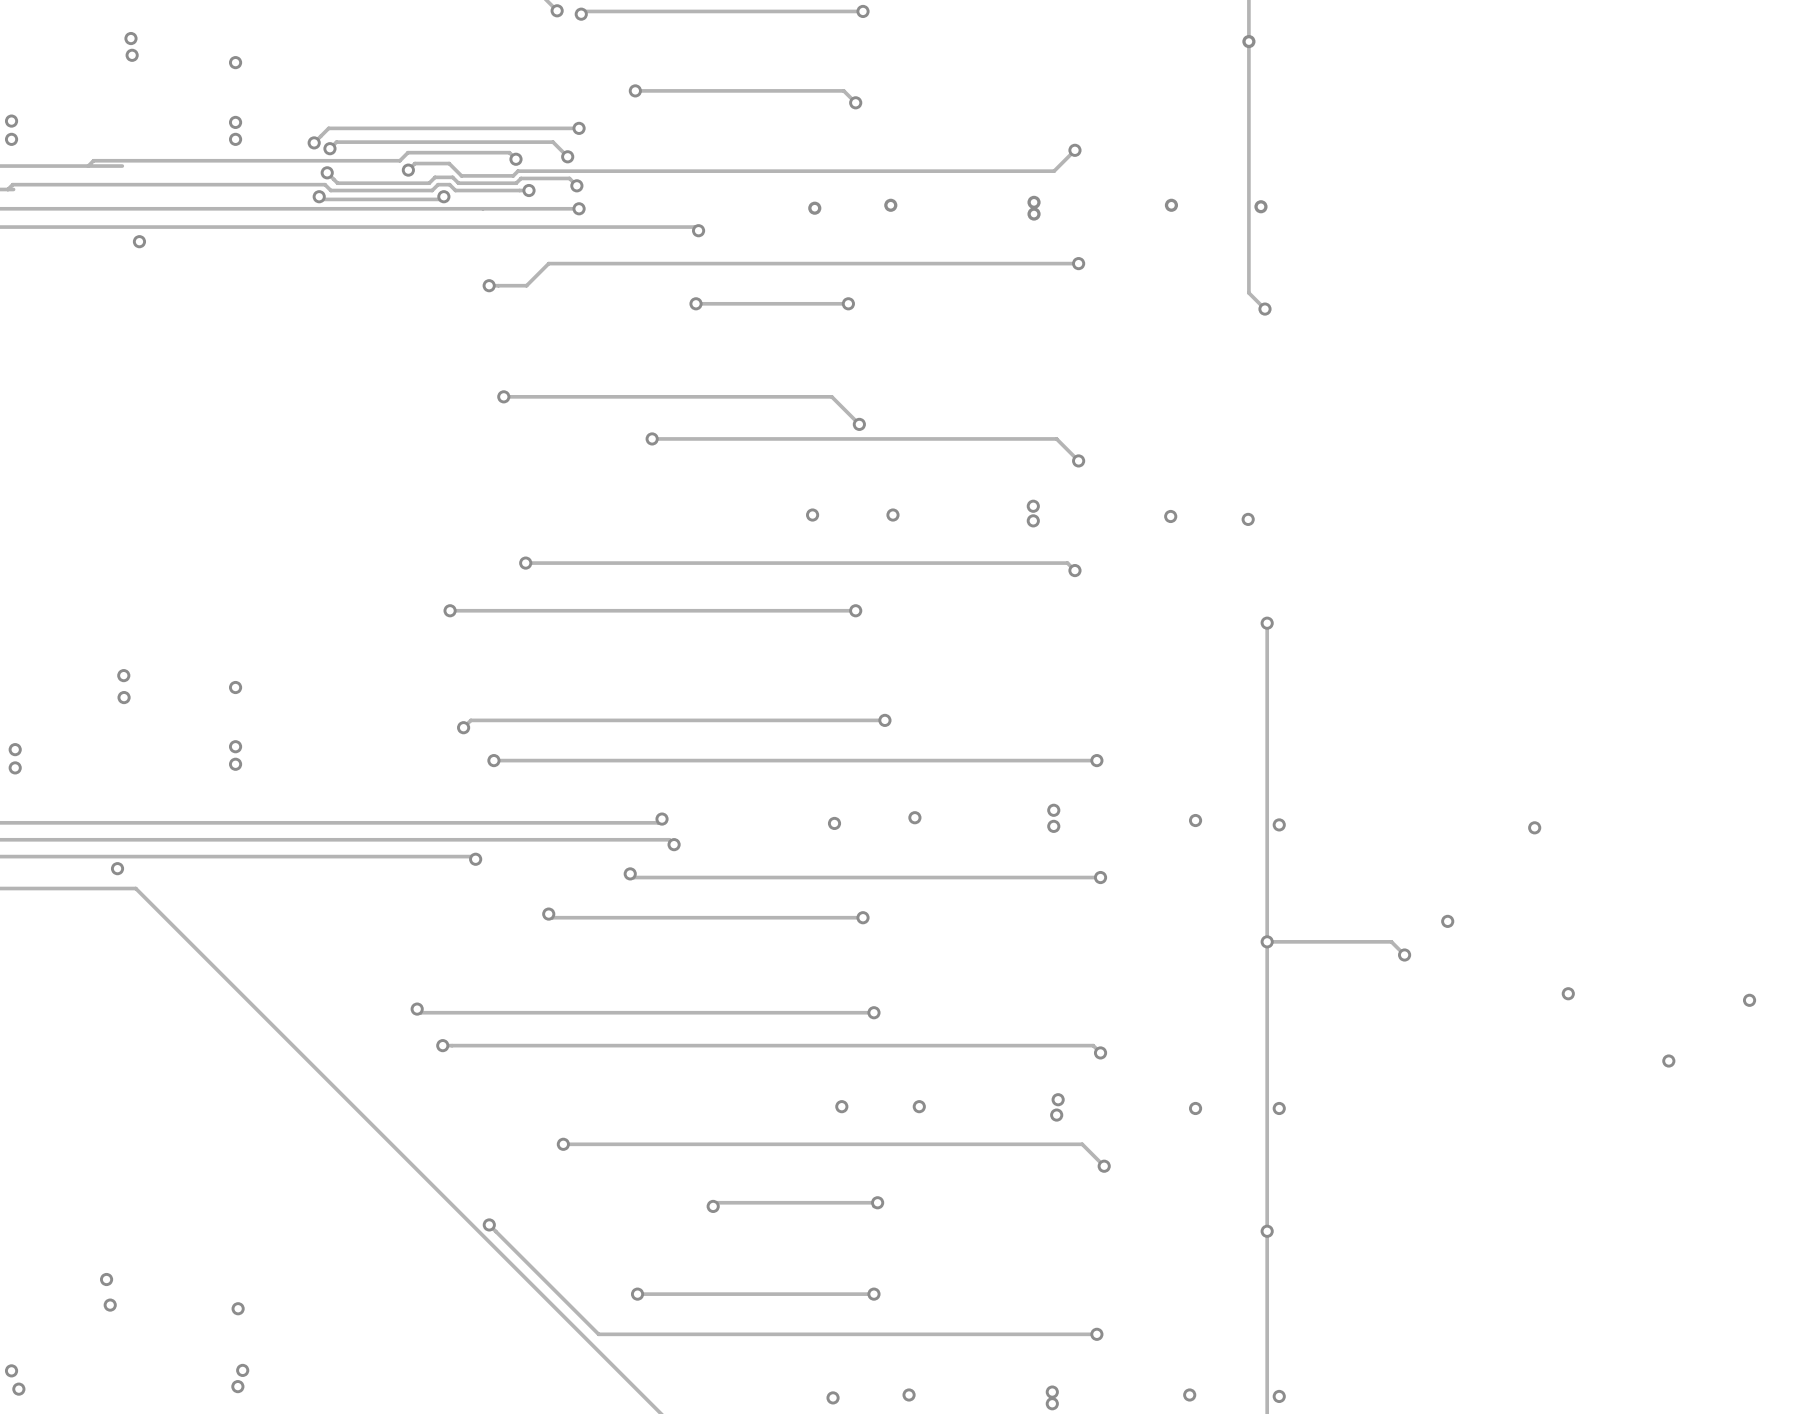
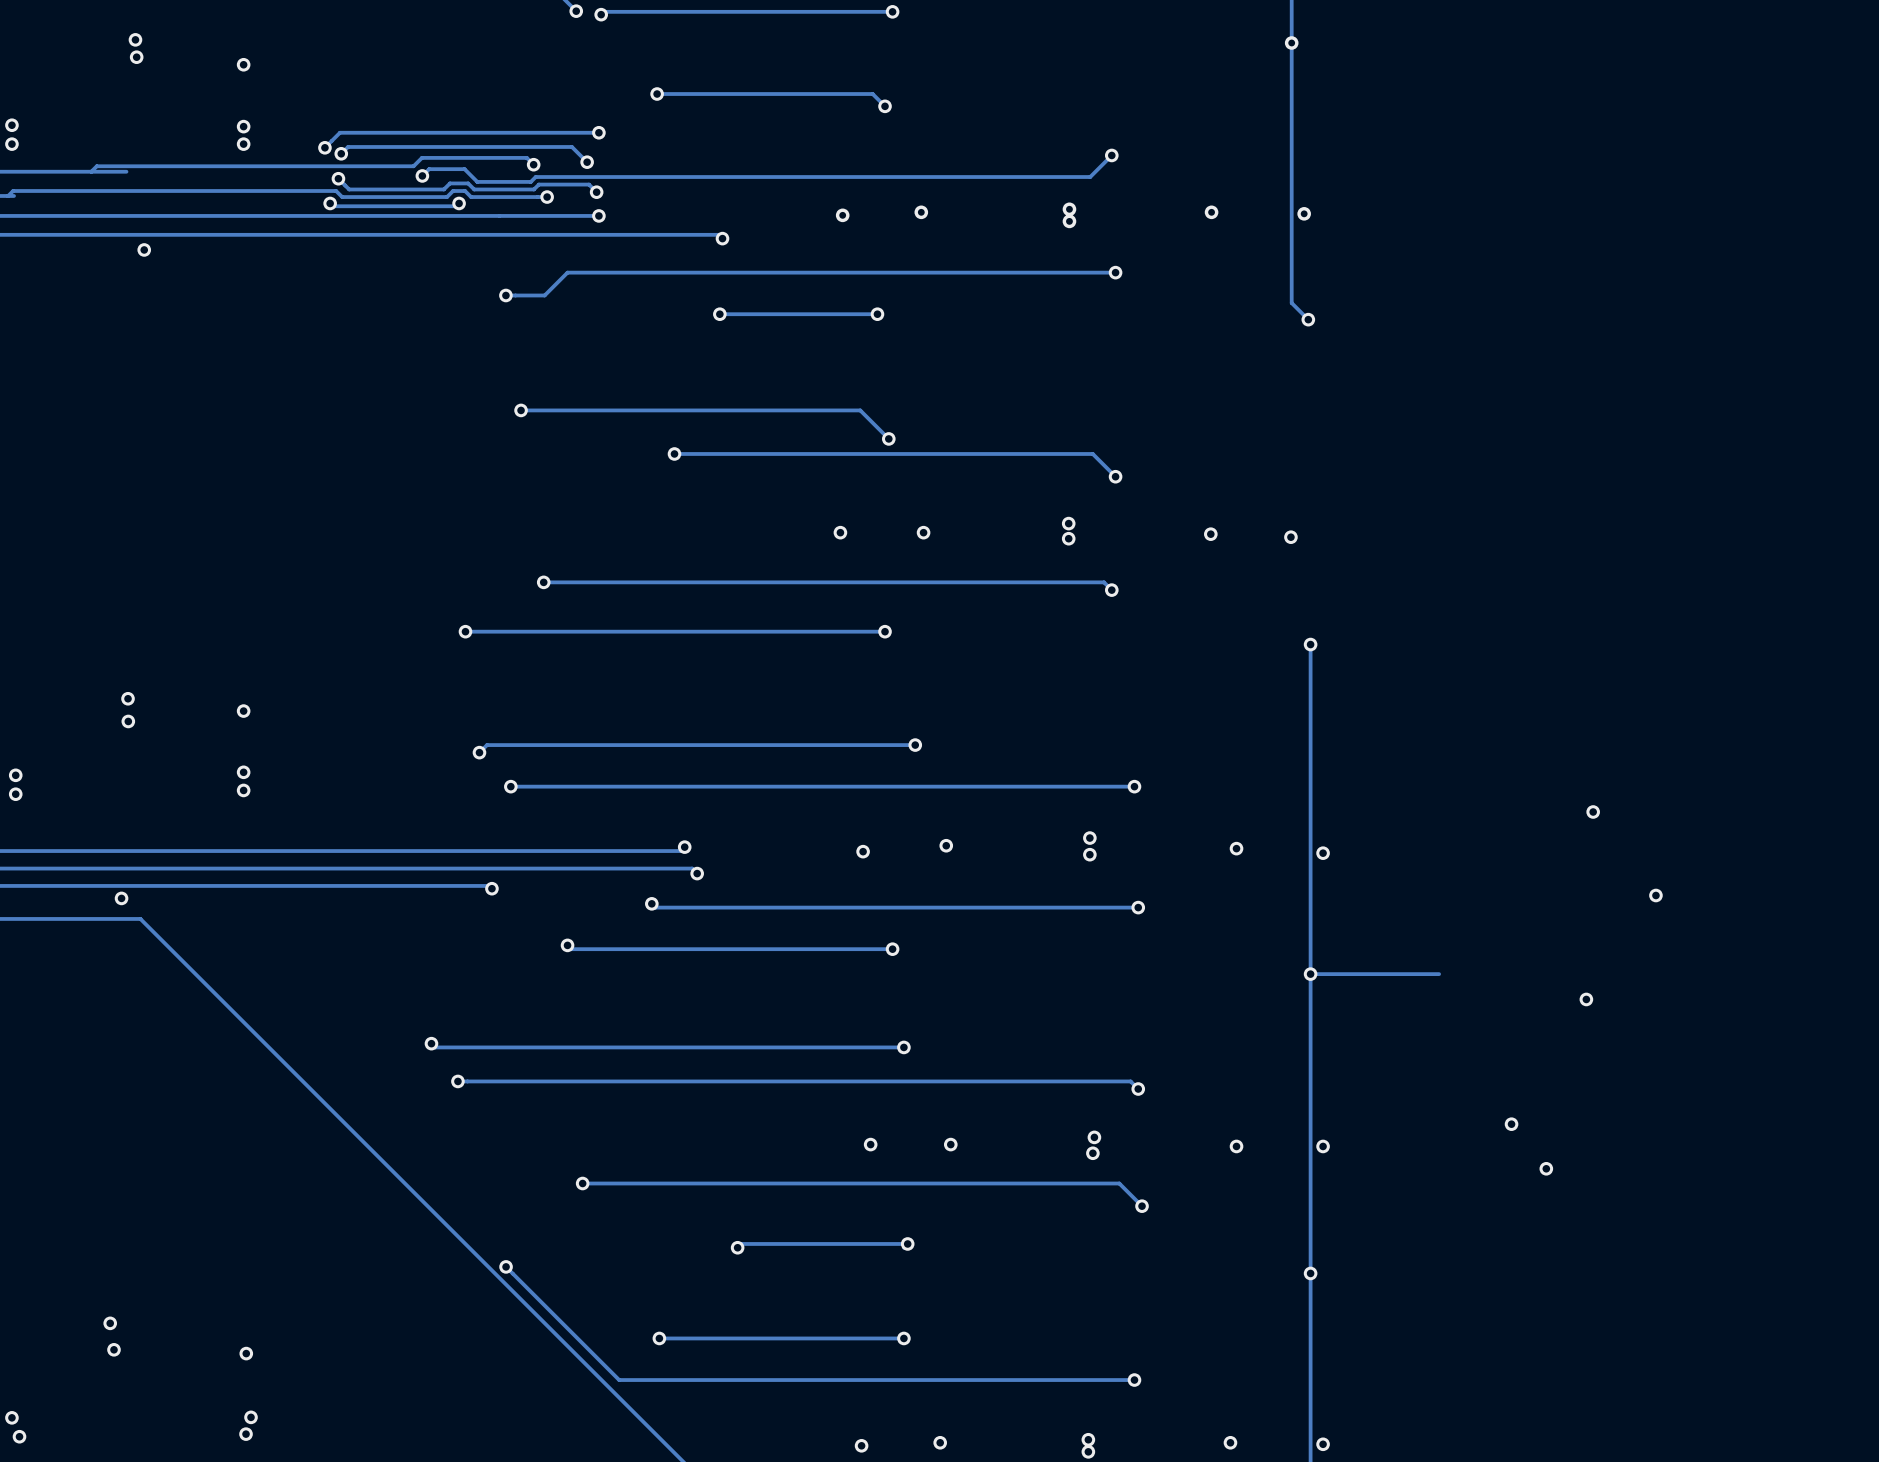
via: none -> (1593, 812)
via: (1534, 827) -> none
via: none -> (1655, 895)
via: (1447, 921) -> none
track: (1391, 941) (1404, 955) -> none
via: (1404, 955) -> none
via position: (1568, 993) -> (1586, 999)
via: (1749, 1000) -> none
via: (1668, 1061) -> none
via: none -> (1511, 1124)
via: none -> (1546, 1168)

